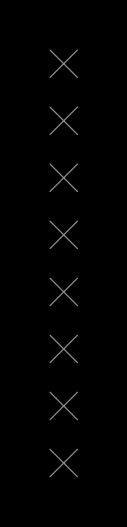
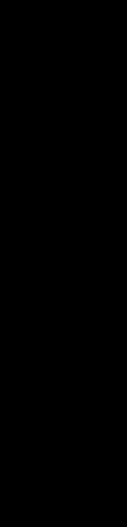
no-connect mark: (63, 63) -> none
no-connect mark: (63, 120) -> none
no-connect mark: (63, 177) -> none
no-connect mark: (63, 234) -> none
no-connect mark: (63, 291) -> none
no-connect mark: (63, 348) -> none
no-connect mark: (63, 405) -> none
no-connect mark: (63, 463) -> none

